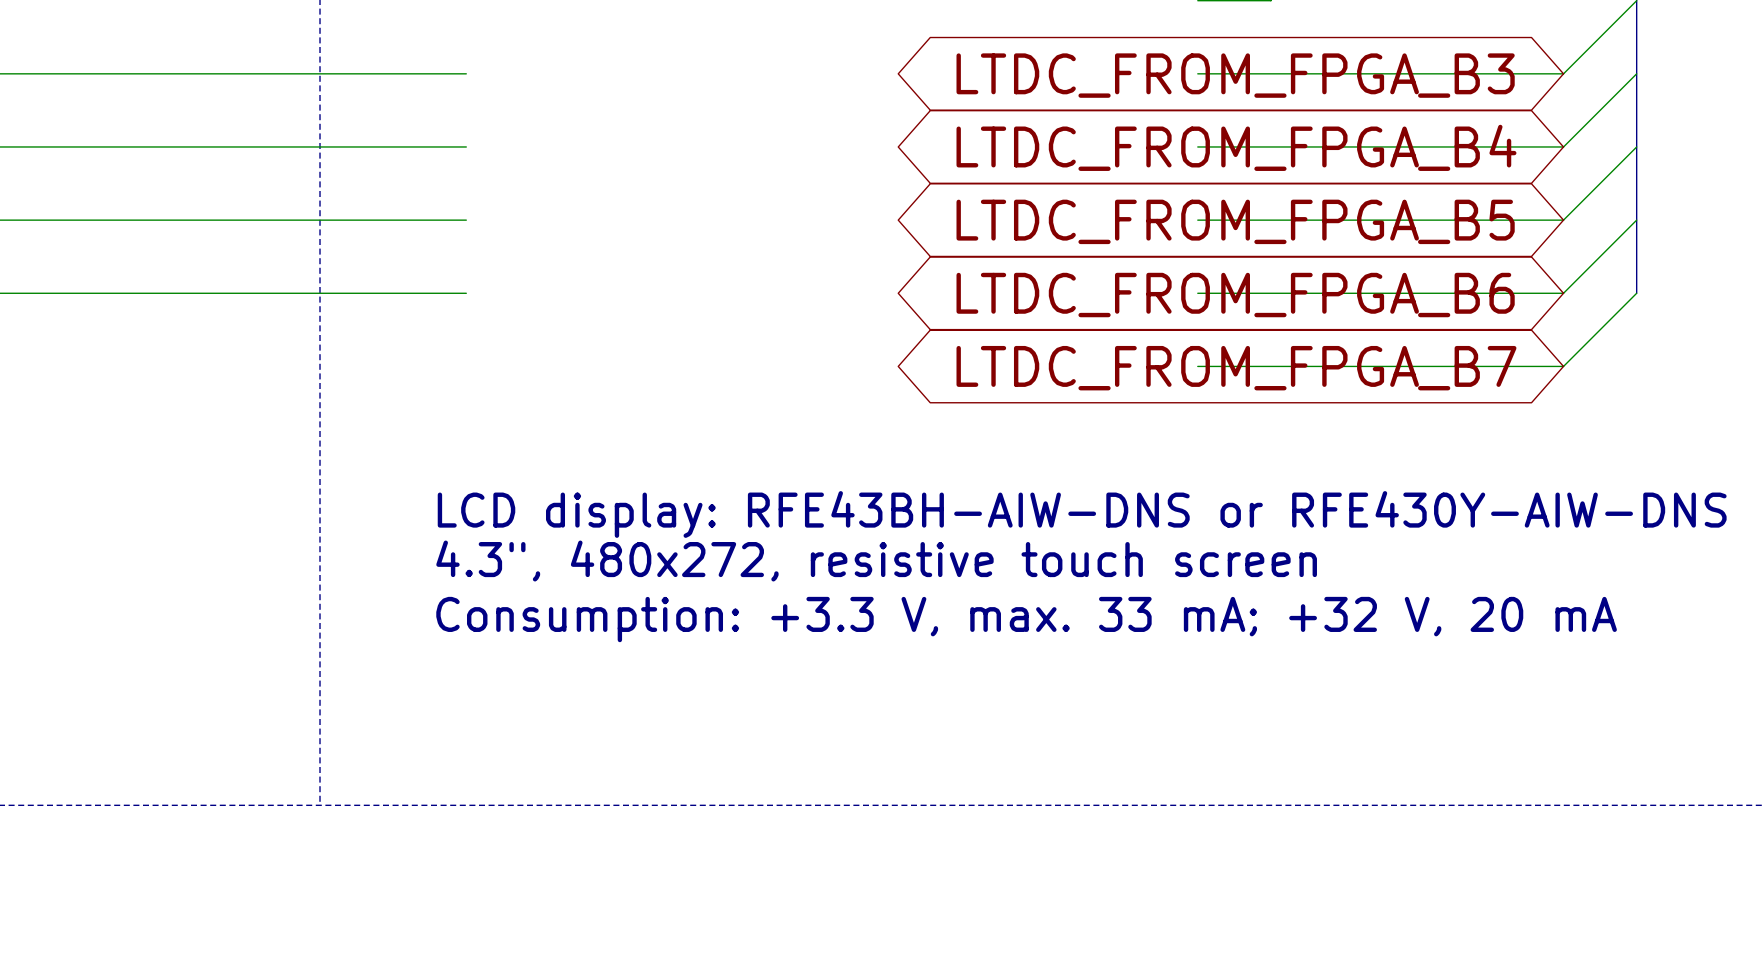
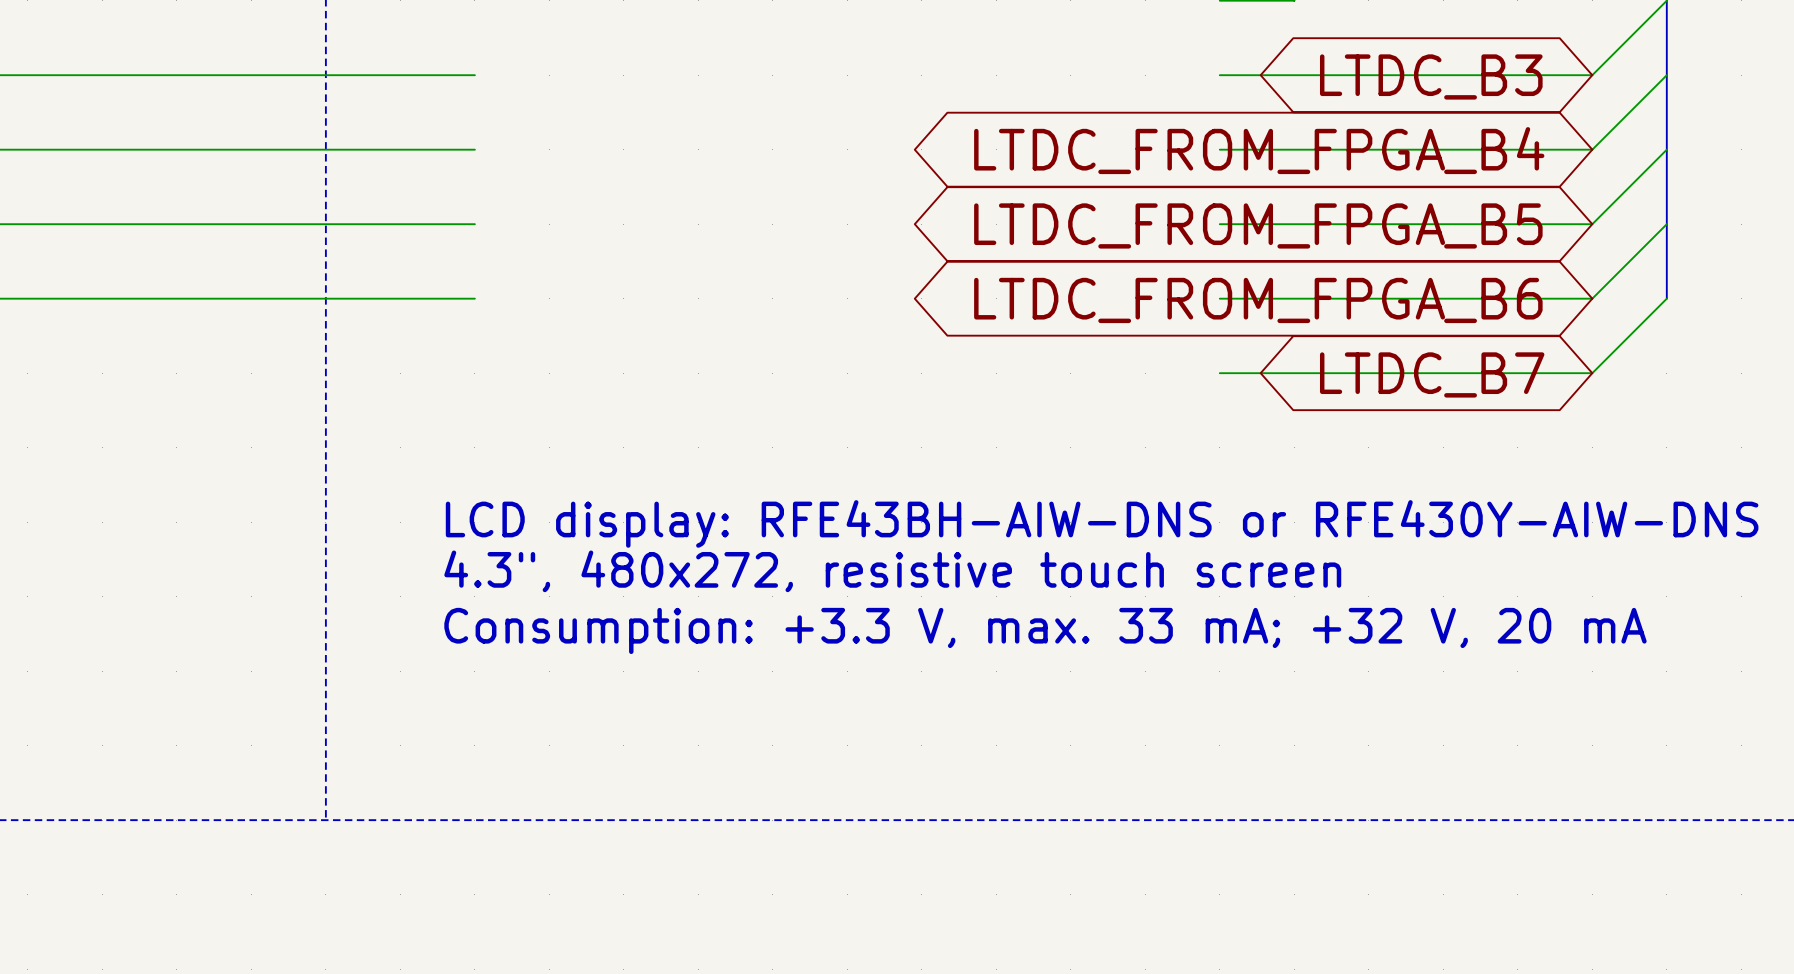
global label: LTDC_FROM_FPGA_B3 (1235, 75) -> LTDC_B3 (1431, 76)
global label: LTDC_FROM_FPGA_B7 (1236, 368) -> LTDC_B7 (1432, 374)

